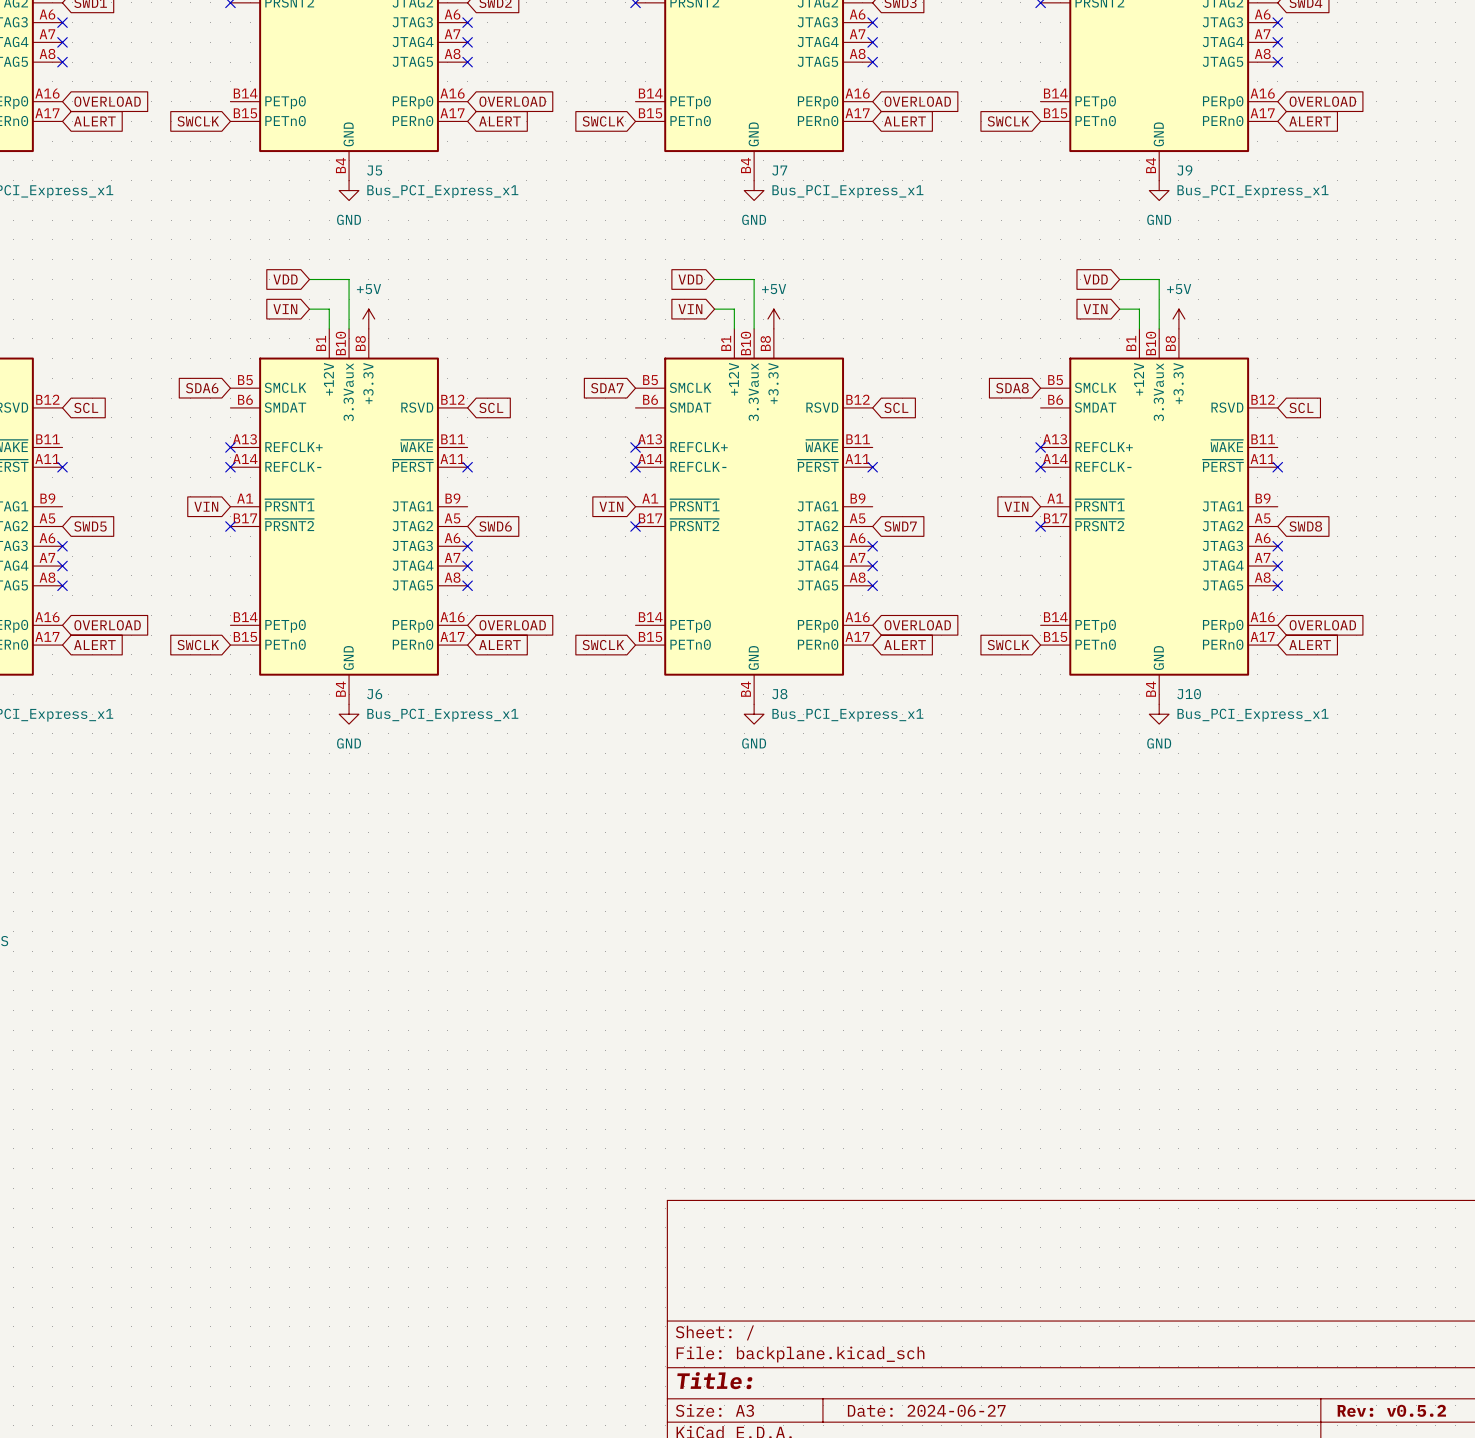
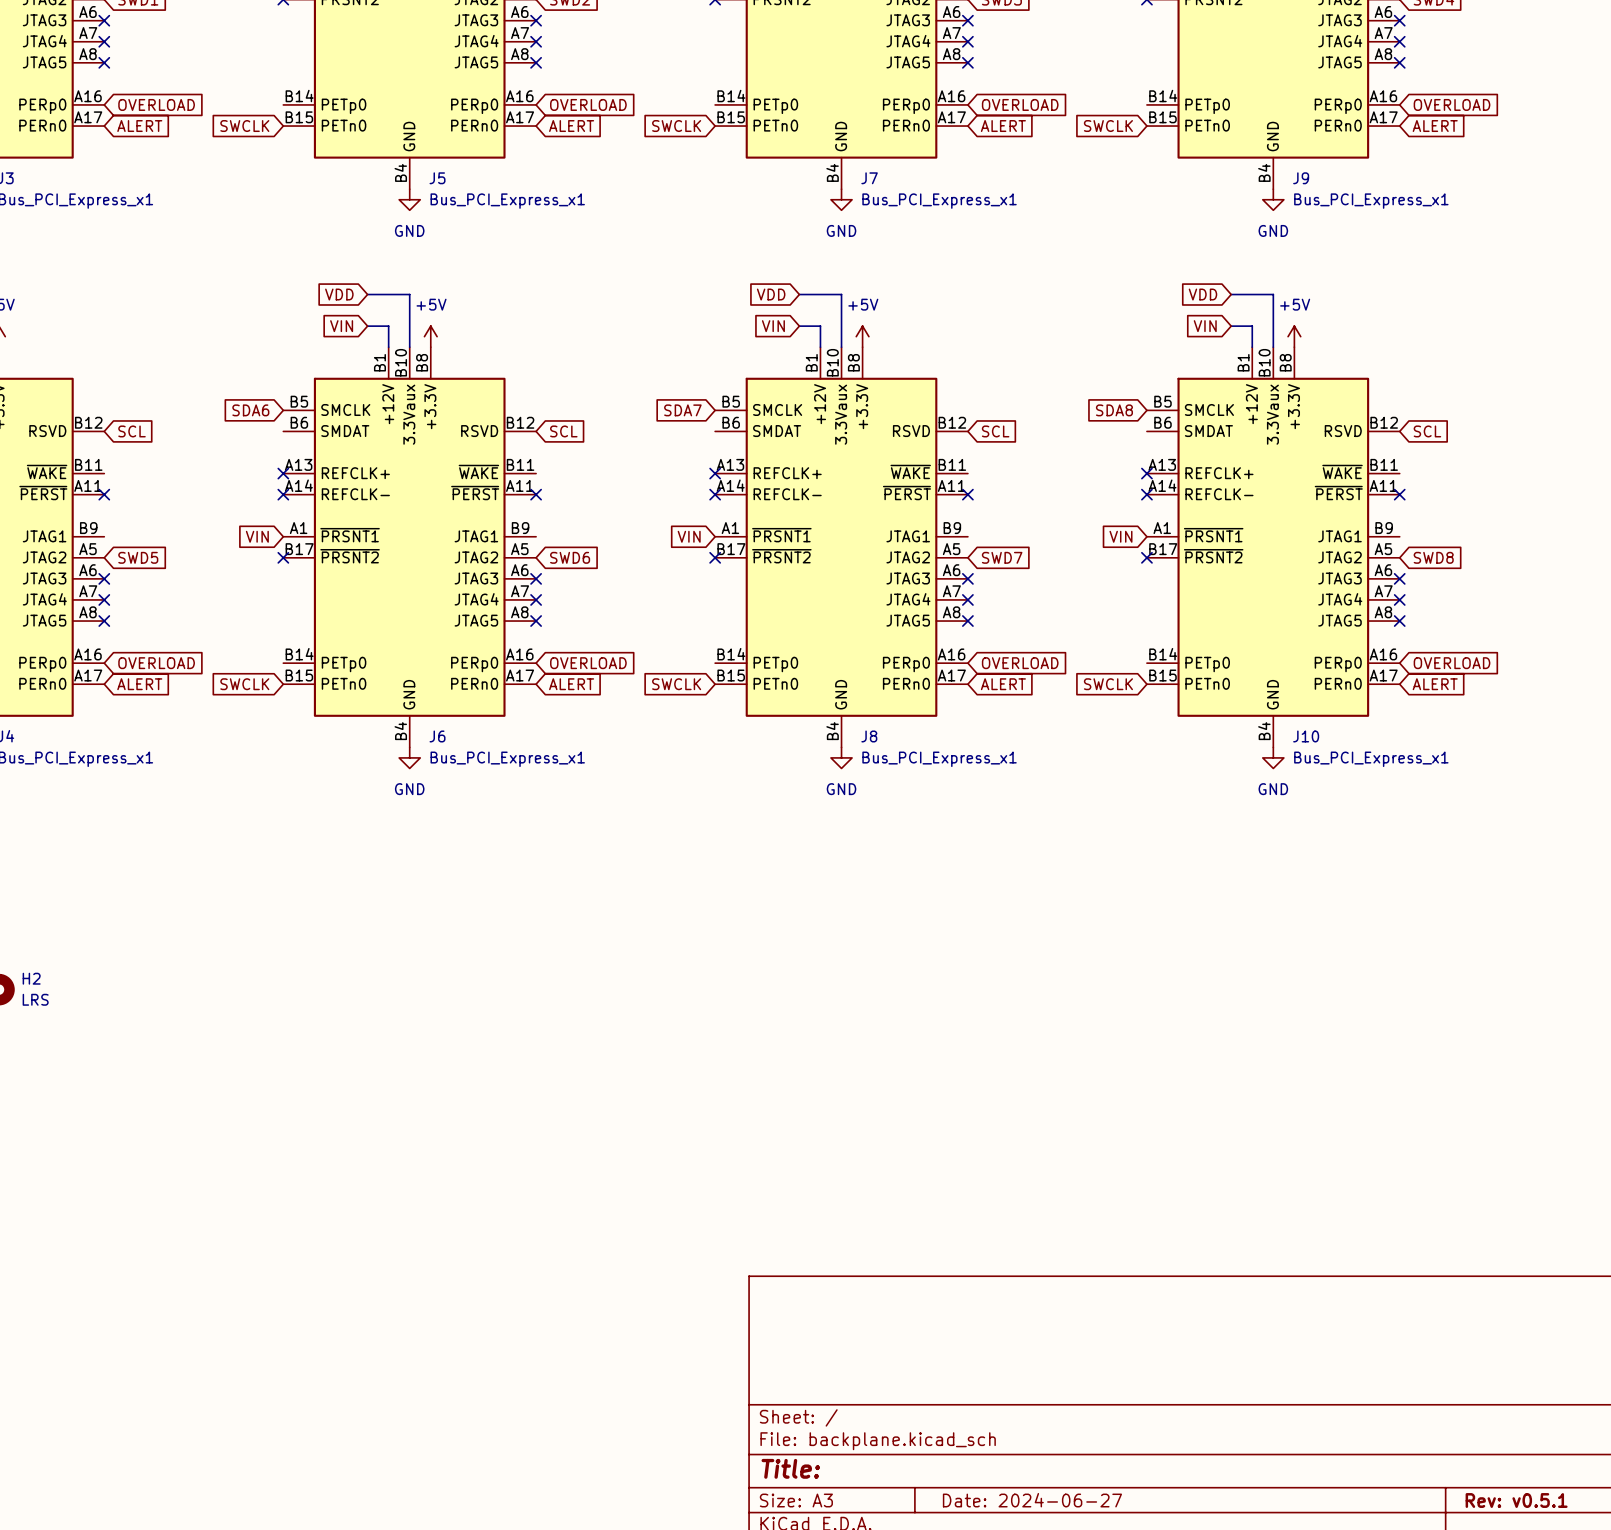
title block: Rev: v0.5.2 (1391, 1410) -> Rev: v0.5.1 (1516, 1500)

